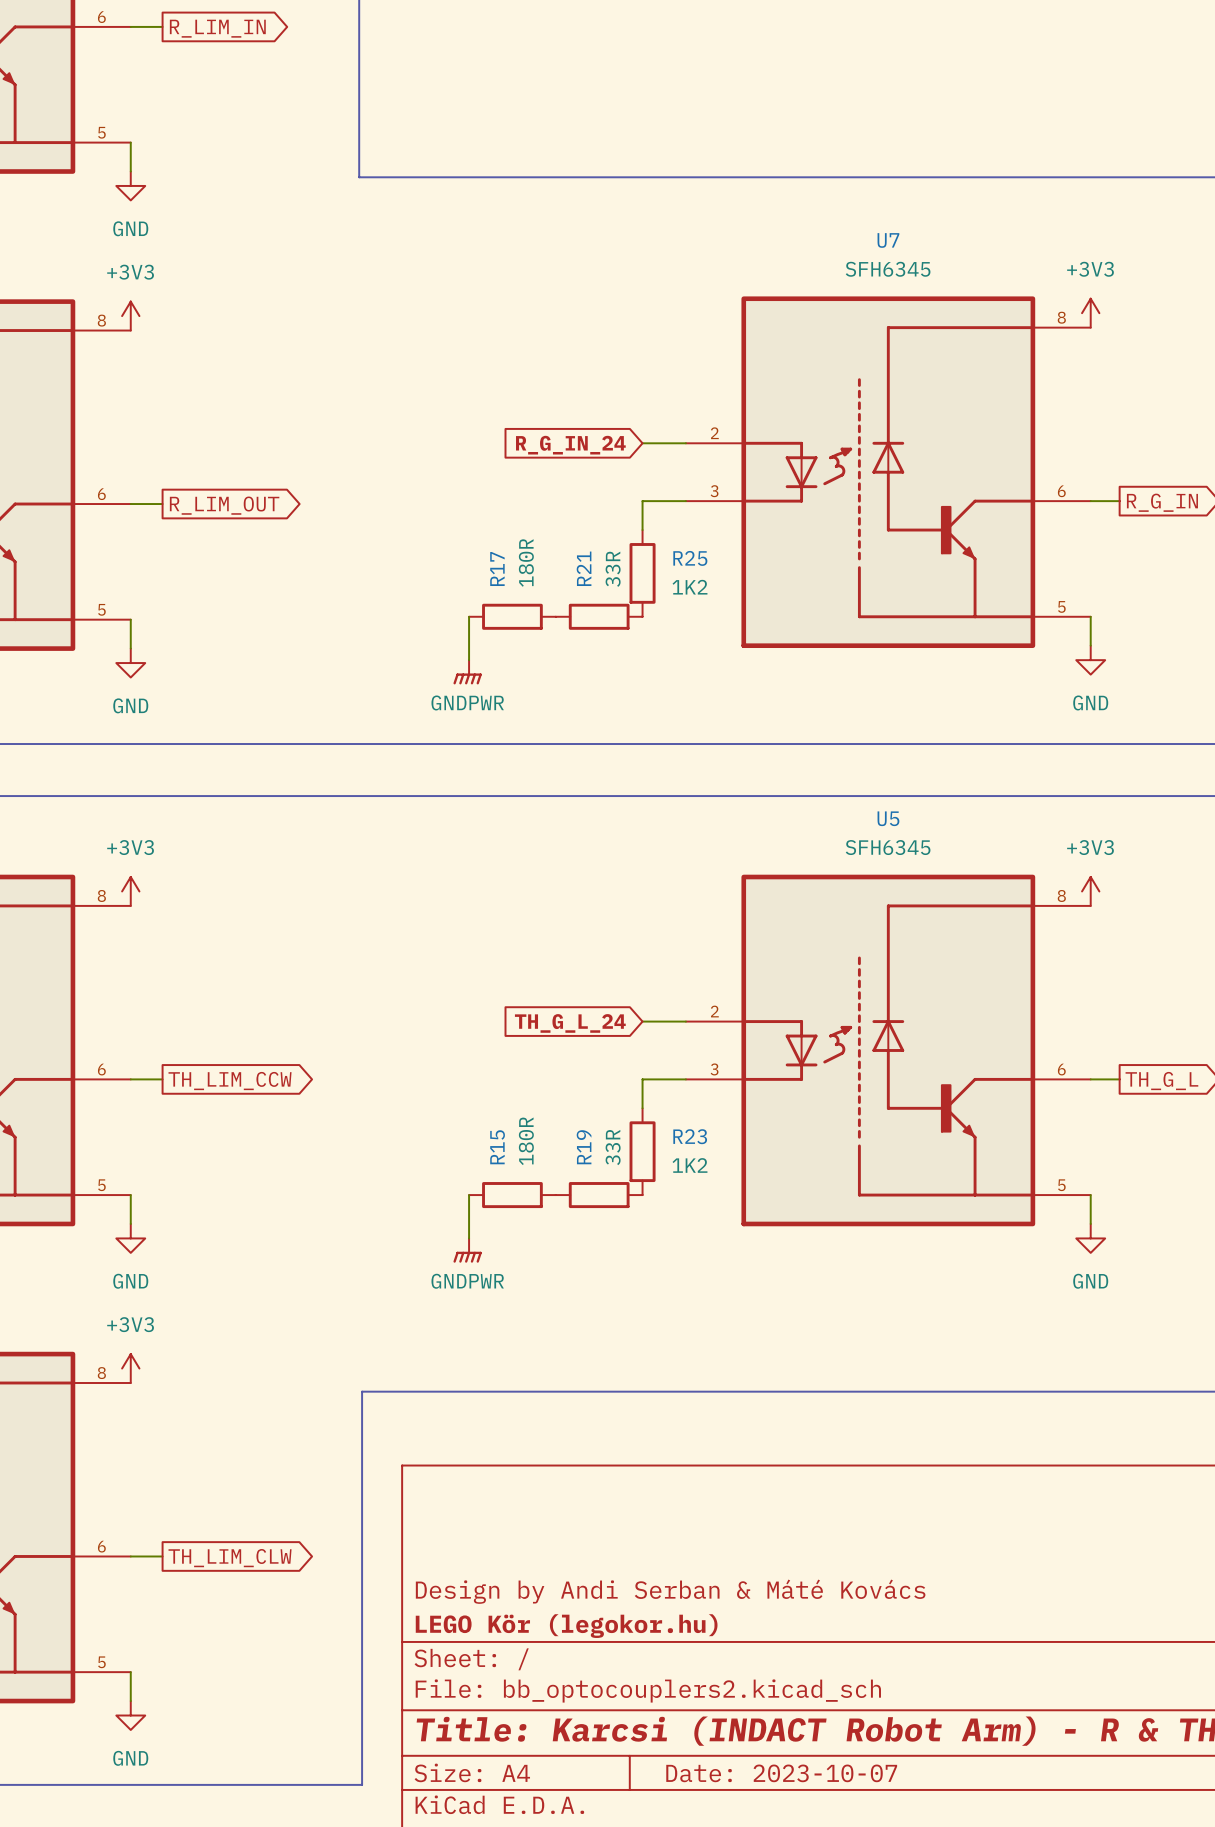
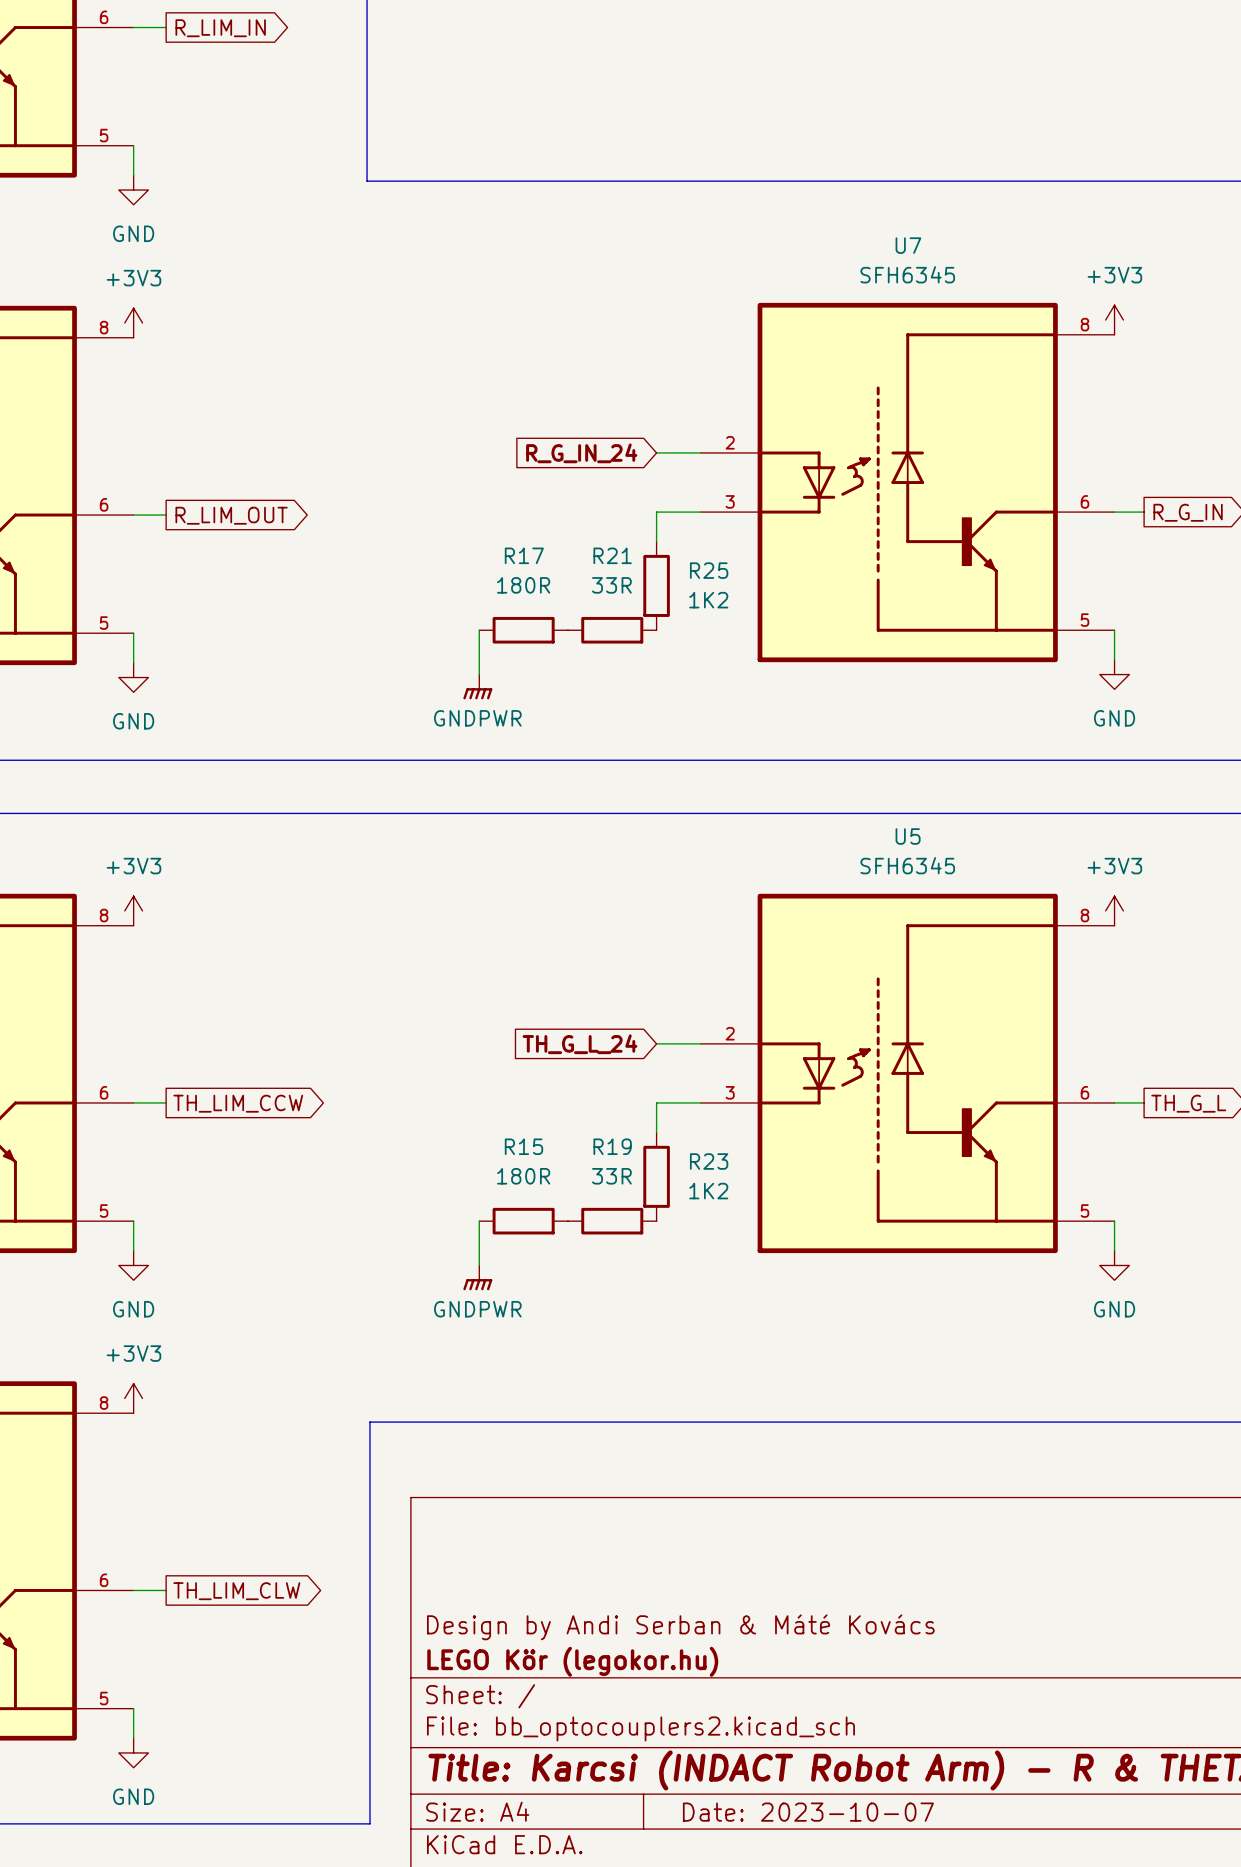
R17 value rotation: 0° (526, 562) -> 90° clockwise (523, 585)
R21 name rotation: 0° (584, 568) -> 90° clockwise (612, 555)
R17 name rotation: 0° (497, 569) -> 90° clockwise (524, 555)
R21 value rotation: 0° (613, 569) -> 90° clockwise (611, 585)
R15 value rotation: 0° (526, 1141) -> 90° clockwise (523, 1176)
R15 name rotation: 0° (497, 1147) -> 90° clockwise (523, 1146)
R19 name rotation: 0° (584, 1147) -> 90° clockwise (612, 1146)
R19 value rotation: 0° (613, 1147) -> 90° clockwise (611, 1176)

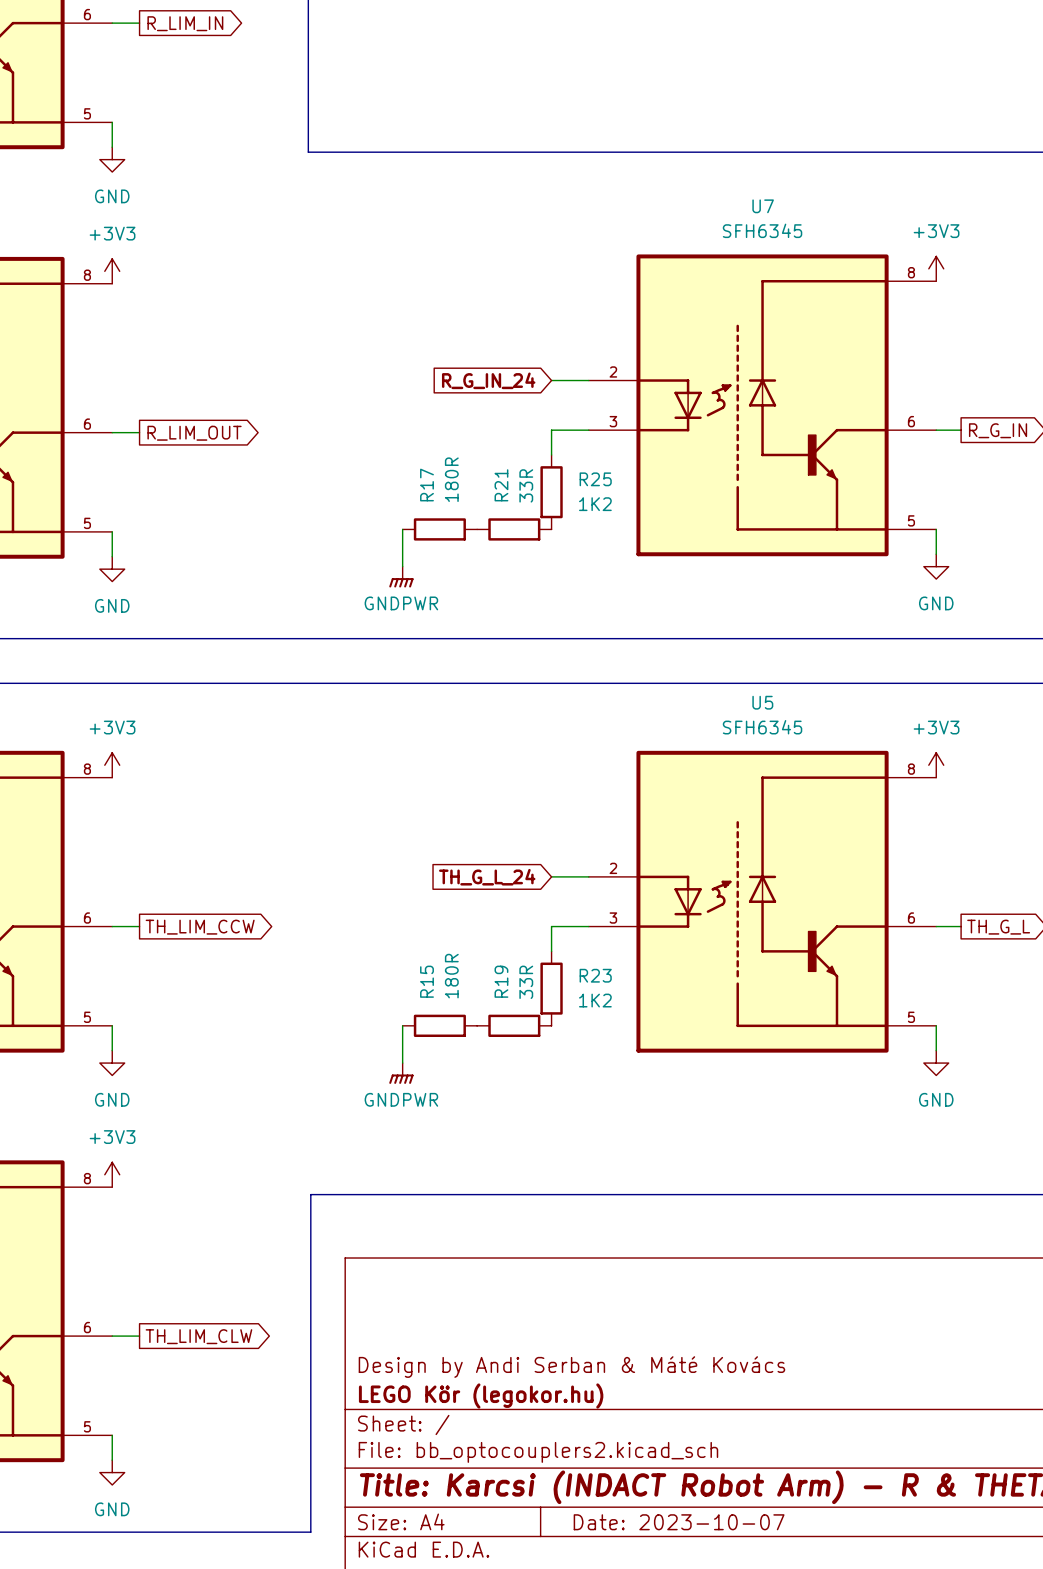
R17 name rotation: 0° (524, 555) -> 90° counterclockwise (427, 485)
R21 name rotation: 0° (612, 555) -> 90° counterclockwise (501, 485)
R17 value rotation: 0° (523, 585) -> 90° counterclockwise (451, 479)
R21 value rotation: 0° (611, 585) -> 90° counterclockwise (526, 485)
R15 name rotation: 0° (523, 1146) -> 90° counterclockwise (427, 981)
R19 name rotation: 0° (612, 1146) -> 90° counterclockwise (501, 981)
R15 value rotation: 0° (523, 1176) -> 90° counterclockwise (451, 976)
R19 value rotation: 0° (611, 1176) -> 90° counterclockwise (526, 982)

